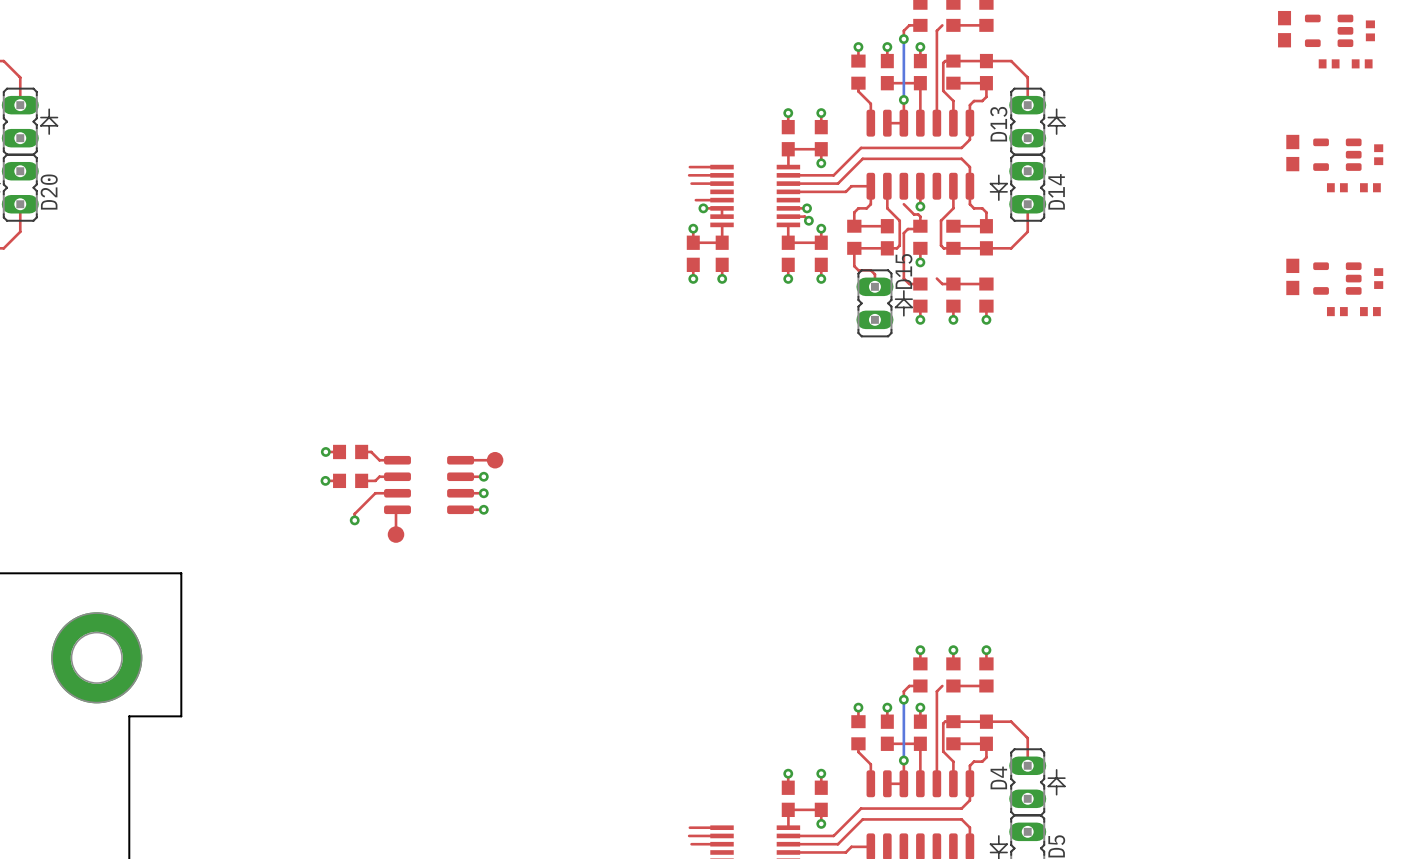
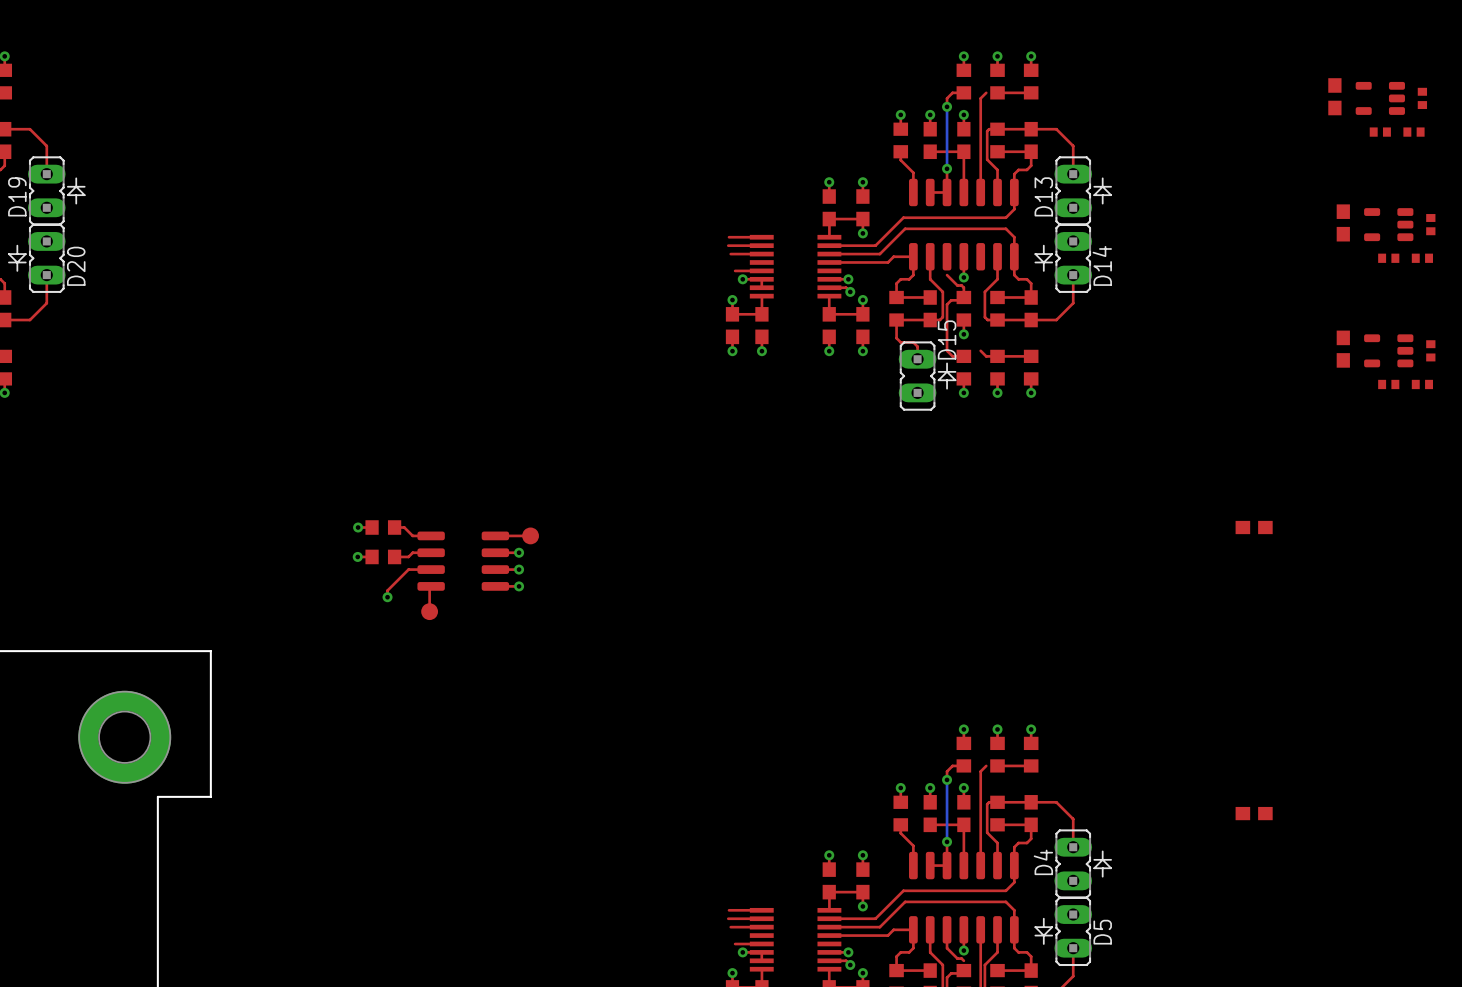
part: none -> (1254, 527)
part: none -> (1254, 813)

